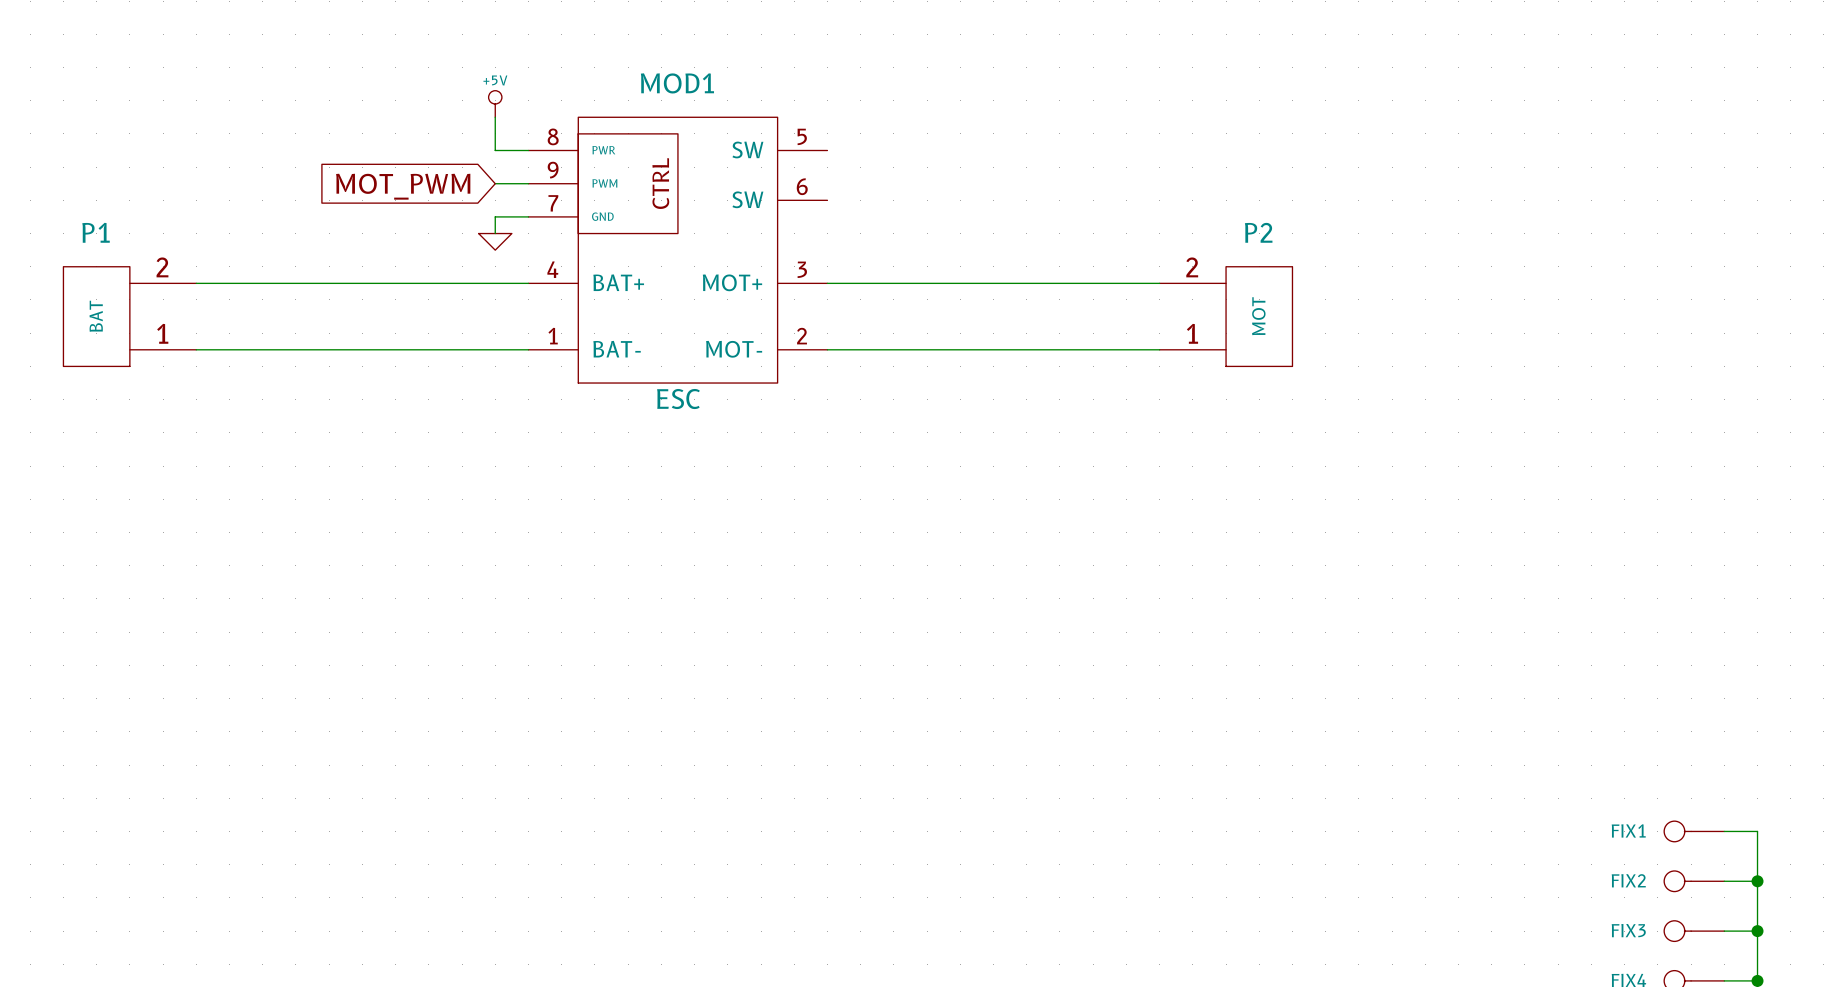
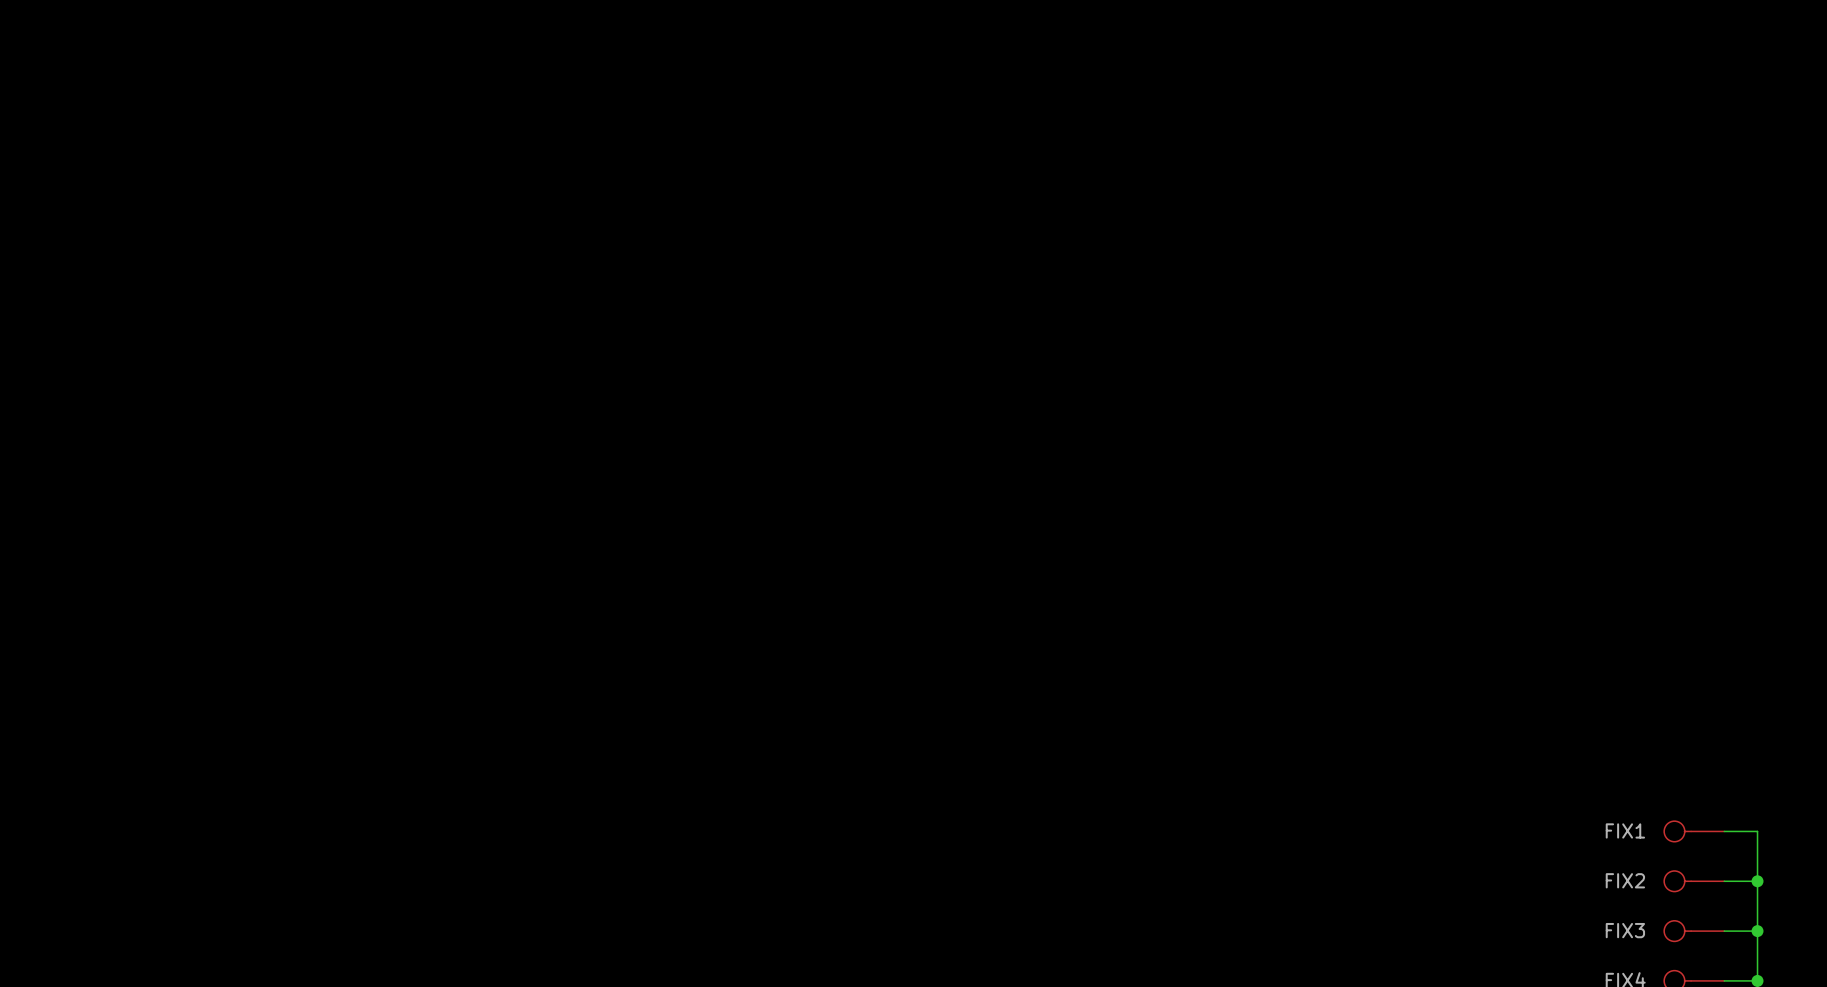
power symbol: +5V (495, 103) -> none
wire: (495, 117) (495, 150) (528, 150) -> none
wire: (495, 183) (528, 183) -> none
global label: MOT_PWM (403, 186) -> none
wire: (528, 216) (495, 216) (495, 233) -> none
power symbol: (495, 241) -> none
MOD1: ESC (677, 250) -> none
wire: (196, 283) (528, 283) -> none
wire: (827, 283) (1159, 283) -> none
P1: BAT (129, 316) -> none
P2: MOT (1226, 316) -> none
wire: (196, 349) (528, 349) -> none
wire: (827, 349) (1159, 349) -> none

